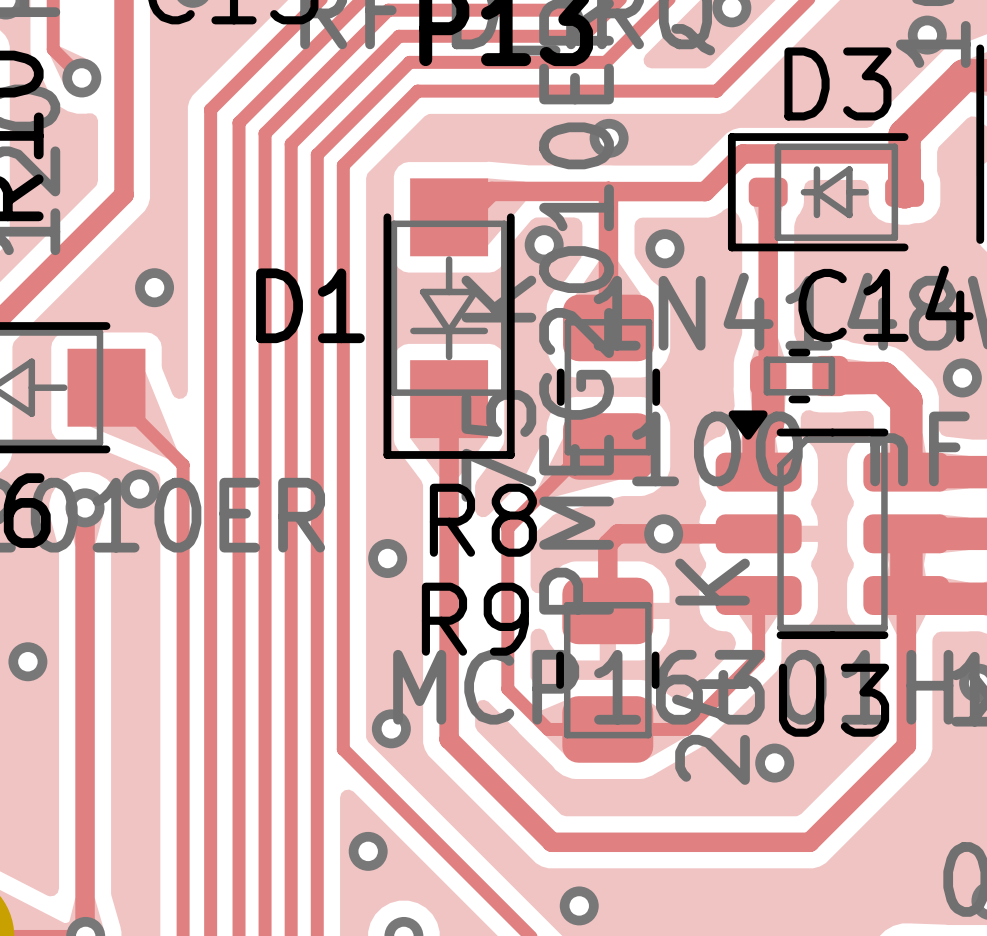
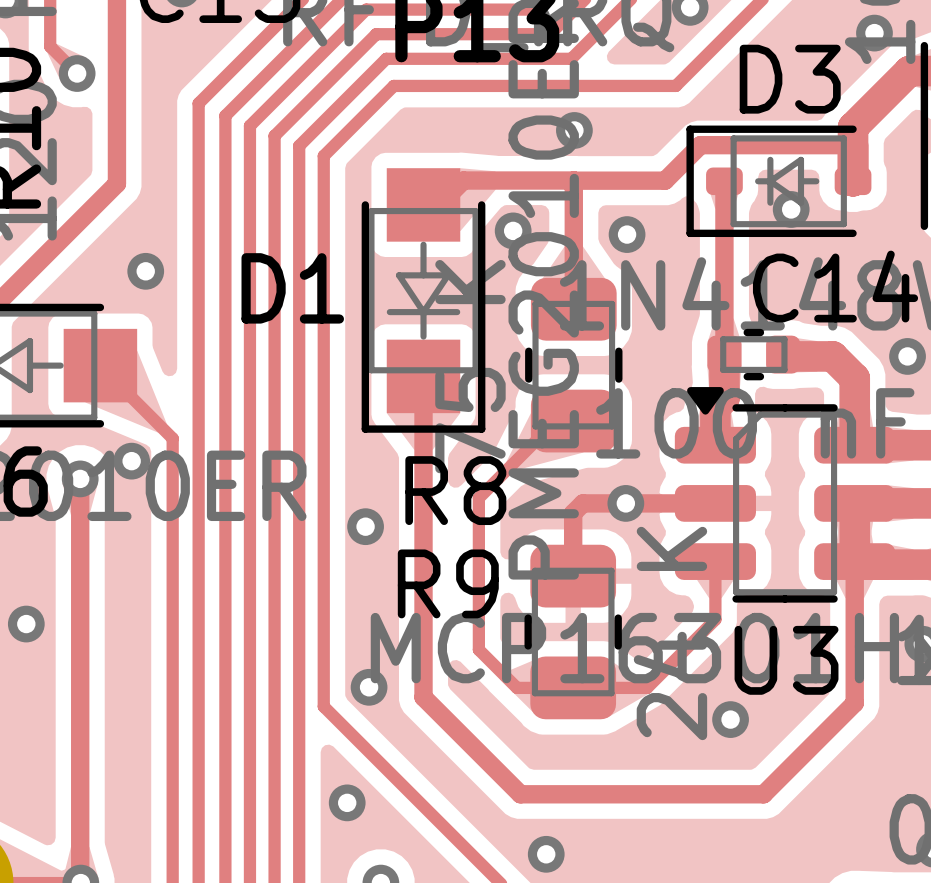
via: none -> (791, 209)

